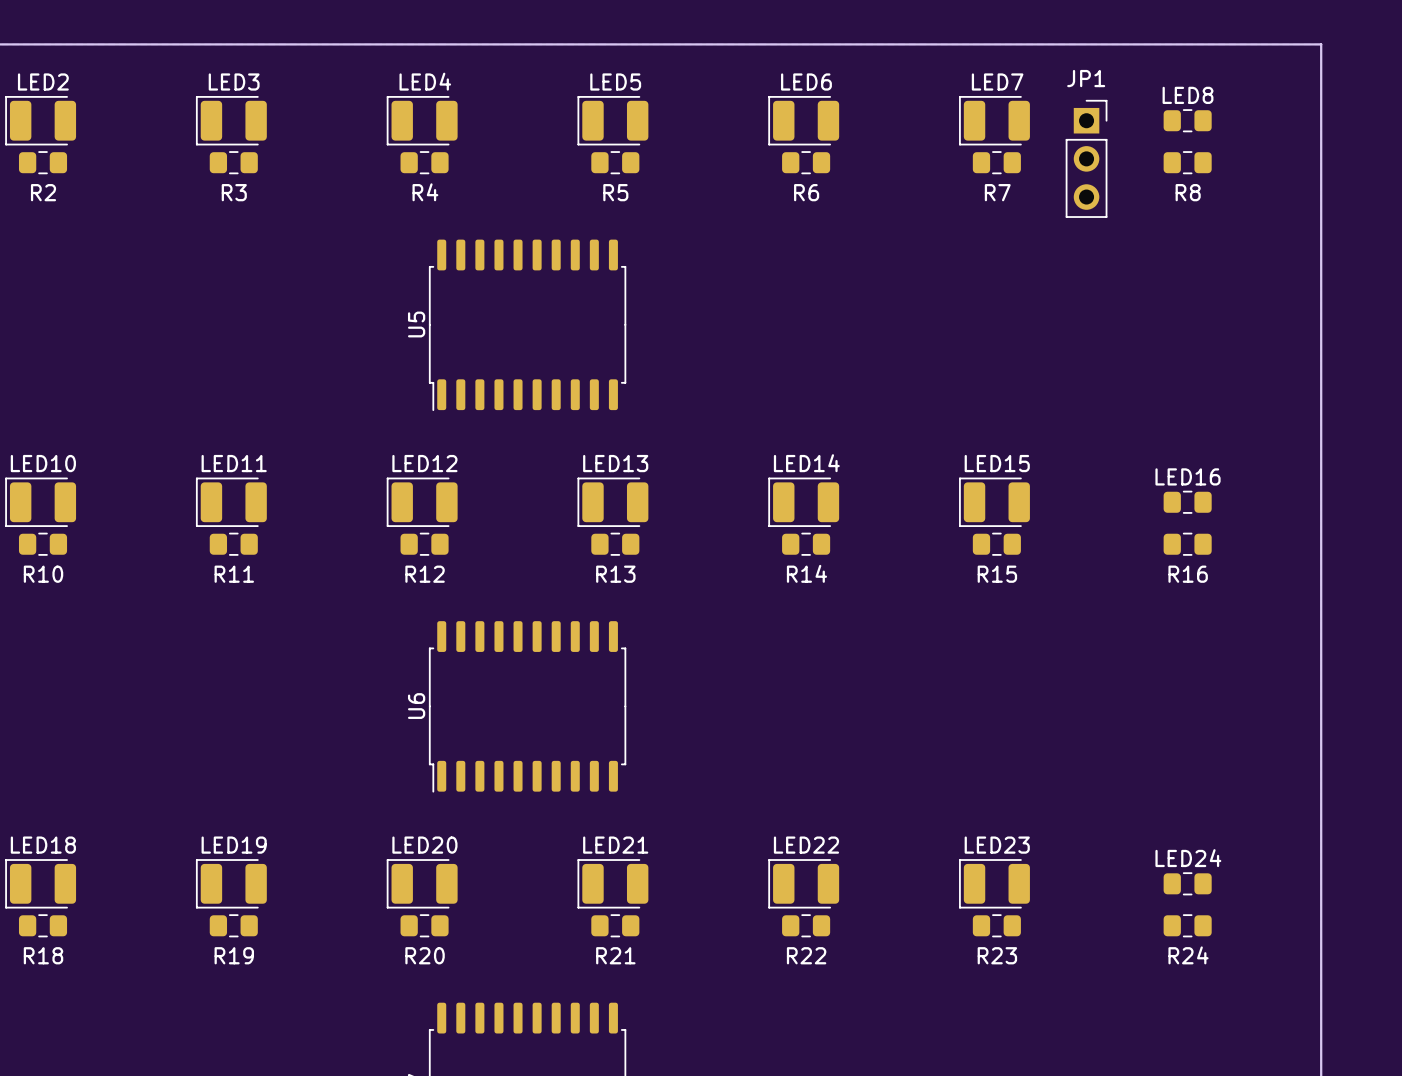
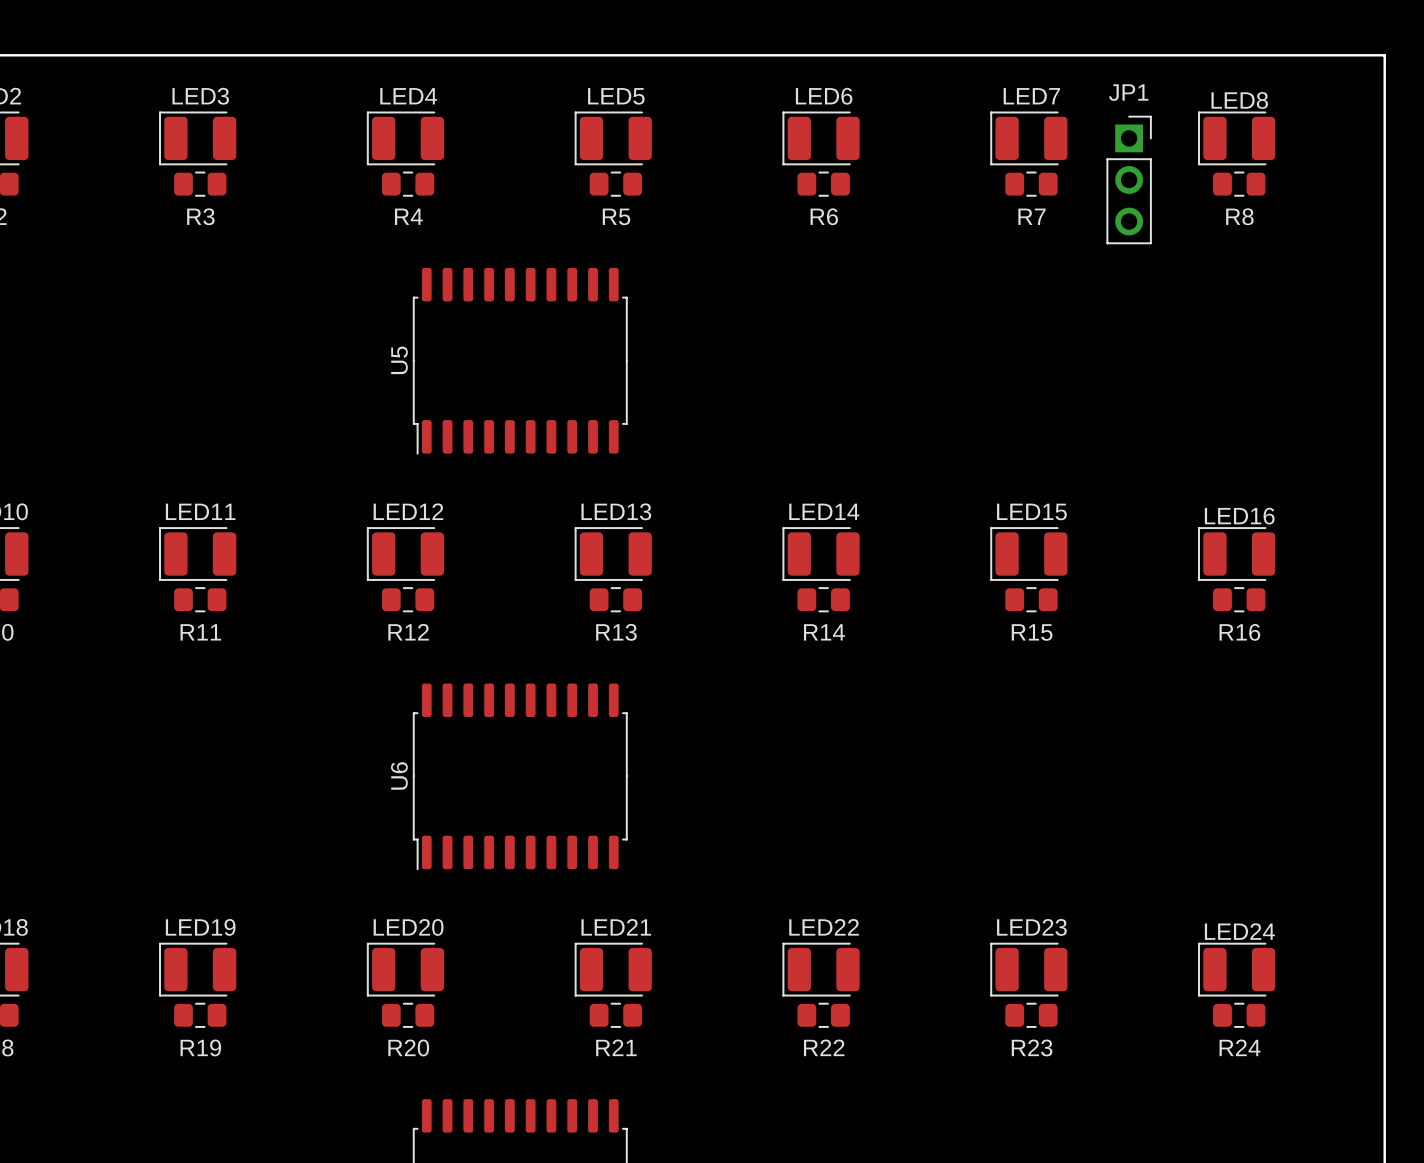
LED8 footprint: [1163, 109, 1212, 133] -> [1198, 111, 1276, 166]
LED16 footprint: [1163, 490, 1212, 514] -> [1198, 527, 1276, 581]
LED24 footprint: [1163, 872, 1212, 896] -> [1198, 942, 1276, 997]

